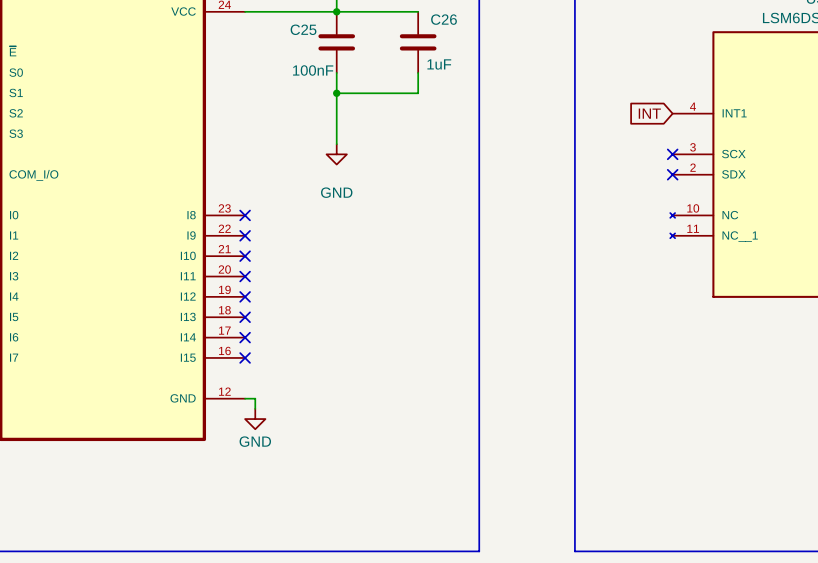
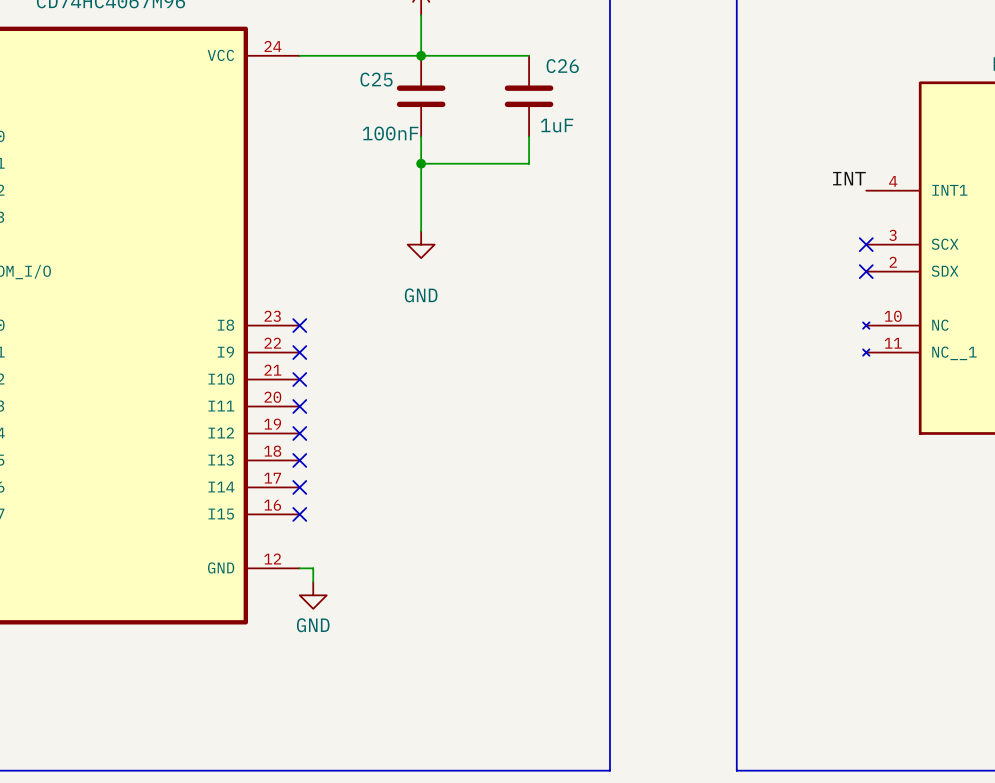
label: none -> INT (849, 178)
global label: INT (649, 113) -> none

